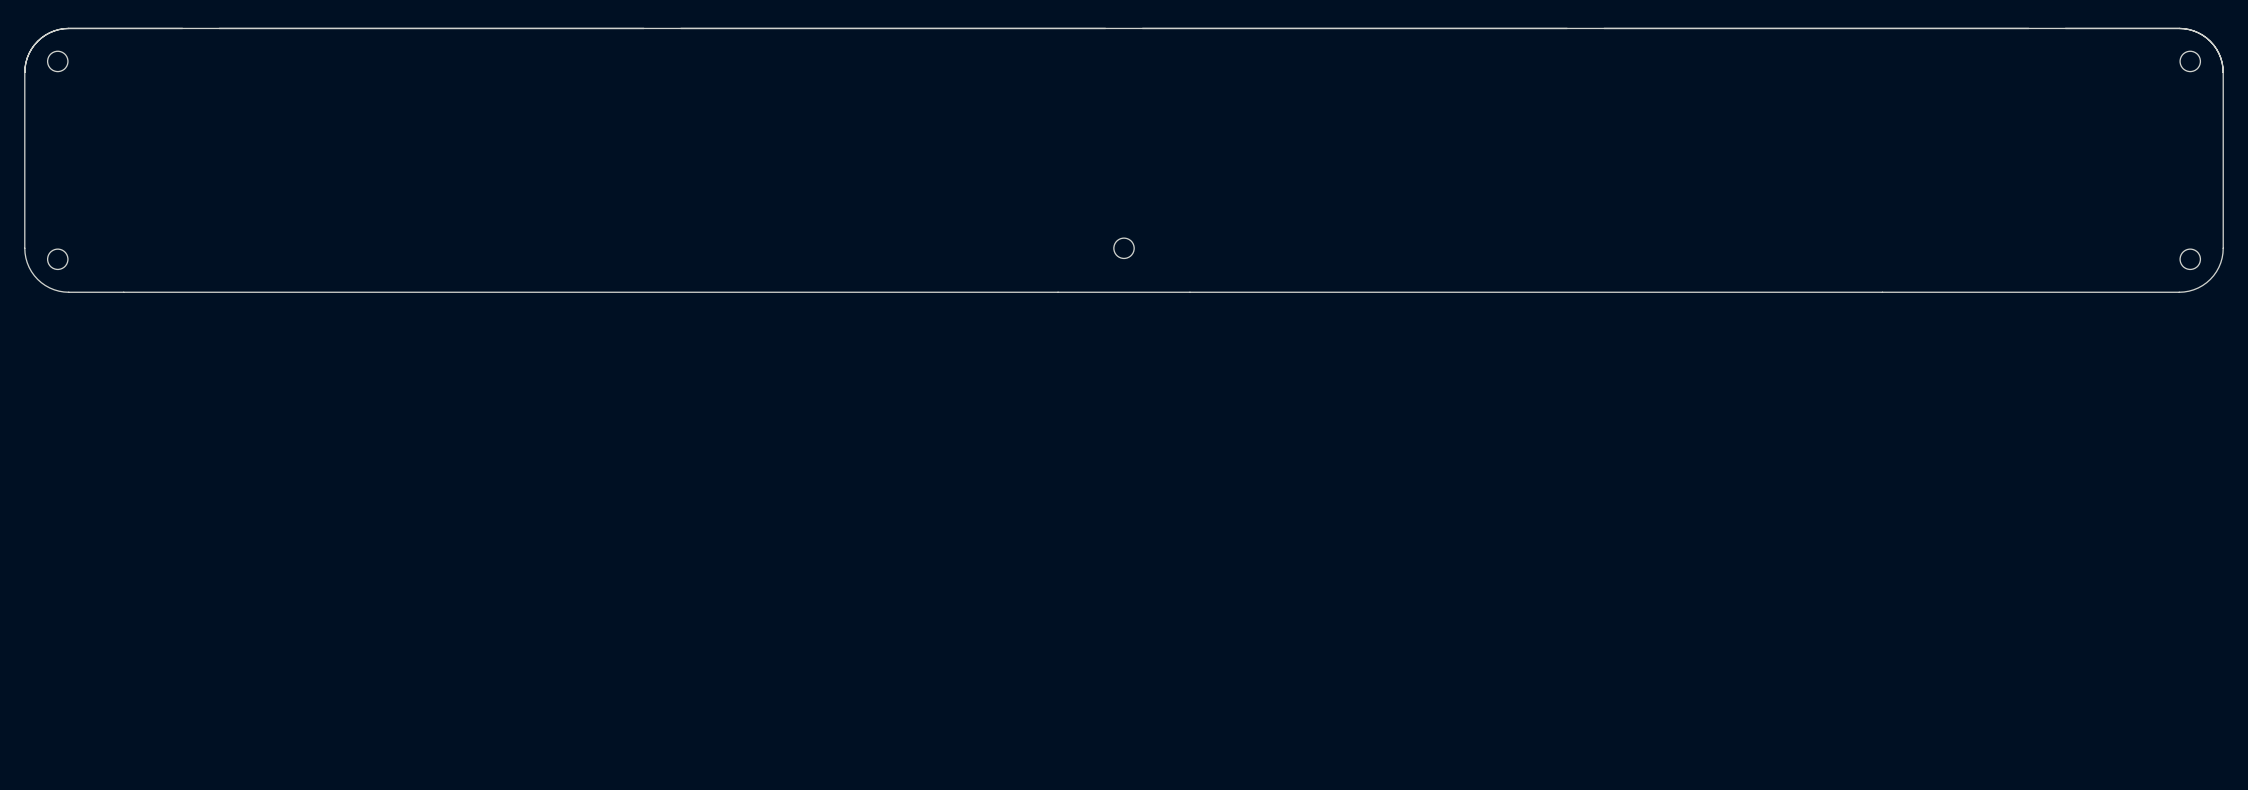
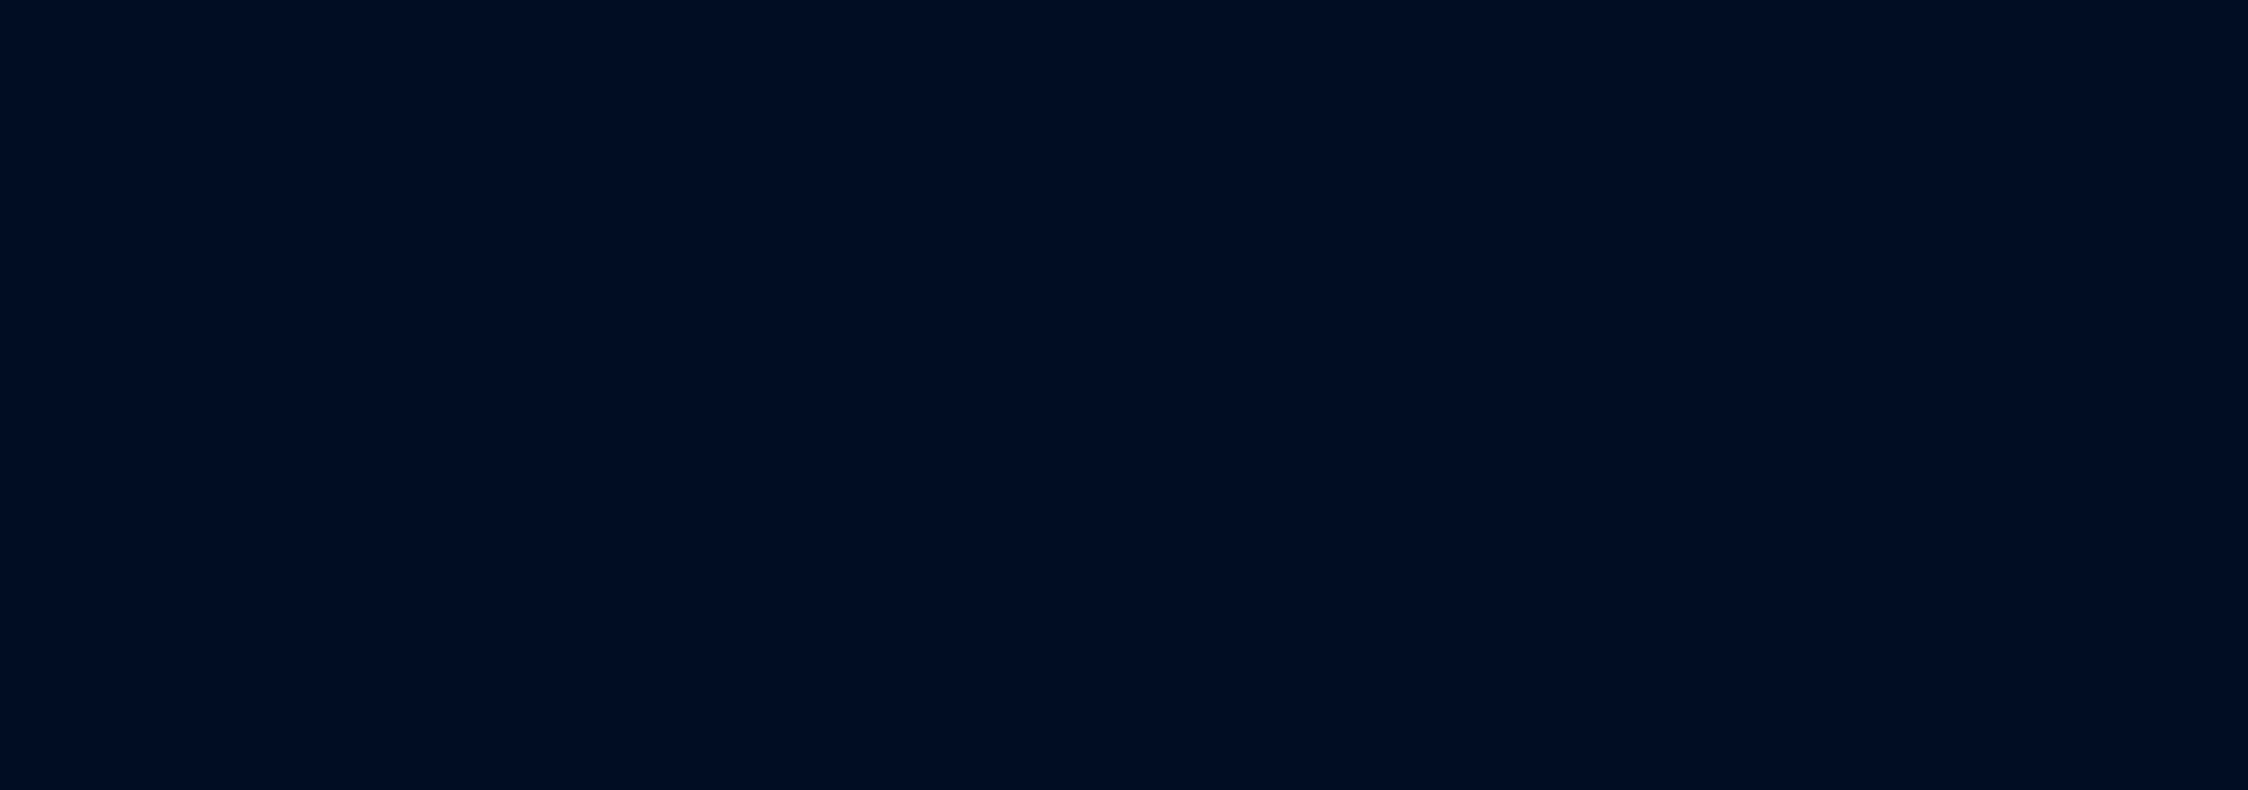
board edge: (68, 28) (2179, 28) -> none
board edge: (68, 28) (49, 32) (37, 41) (29, 53) (24, 72) -> none
board edge: (68, 28) (49, 32) (37, 41) (29, 53) (24, 72) -> none
board edge: (2179, 28) (2193, 30) (2210, 41) (2218, 53) (2223, 72) -> none
board edge: (2179, 28) (2193, 30) (2210, 41) (2218, 53) (2223, 72) -> none
round board edge: [47, 51, 69, 72] -> none
round board edge: [2179, 51, 2201, 72] -> none
board edge: (24, 72) (25, 258) (31, 271) (41, 282) (54, 289) (68, 292) (2184, 291) (2198, 287) (2210, 279) (2218, 267) (2222, 258) (2223, 72) -> none
round board edge: [1113, 237, 1135, 259] -> none
round board edge: [47, 248, 69, 270] -> none
round board edge: [2179, 248, 2201, 270] -> none

